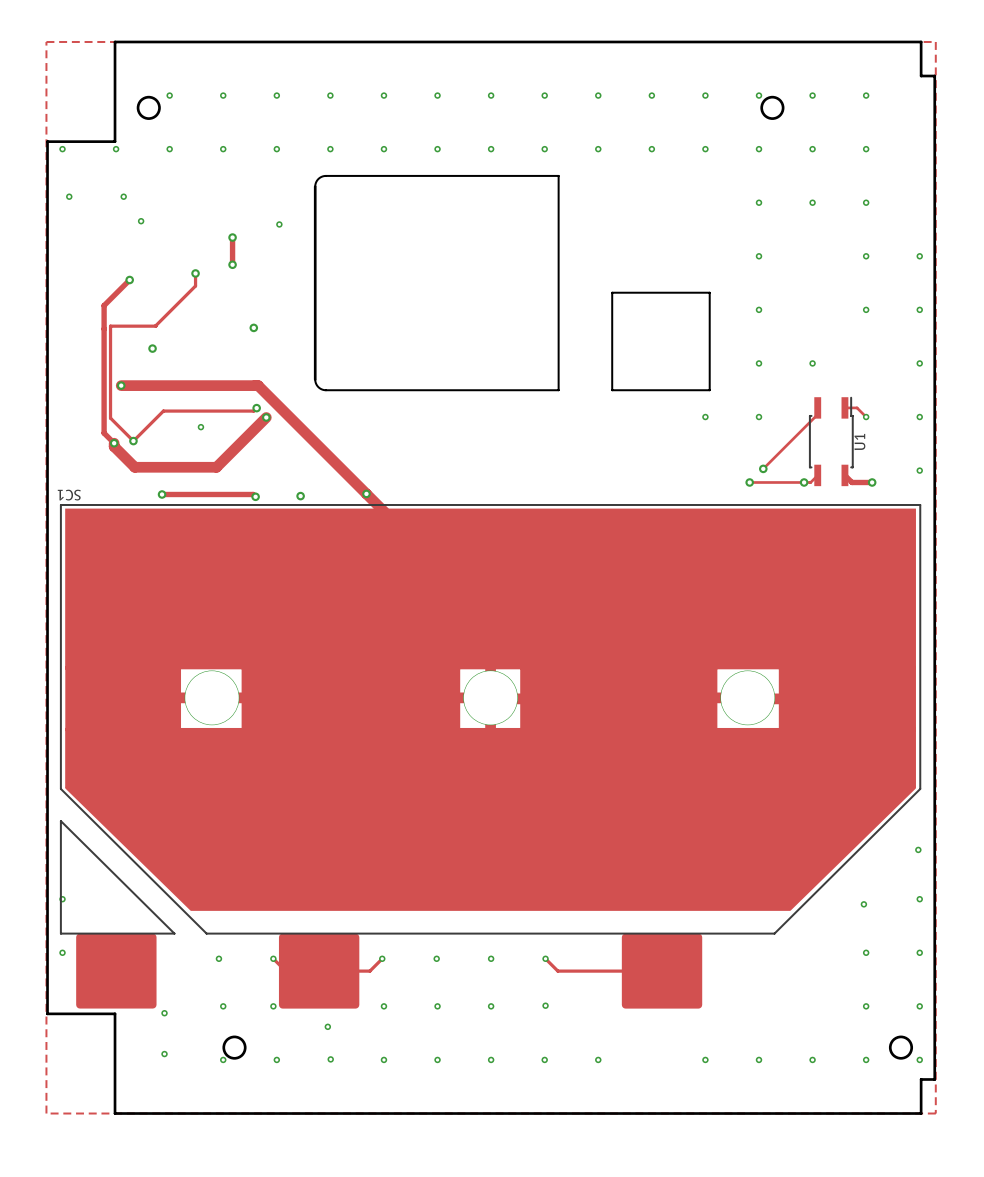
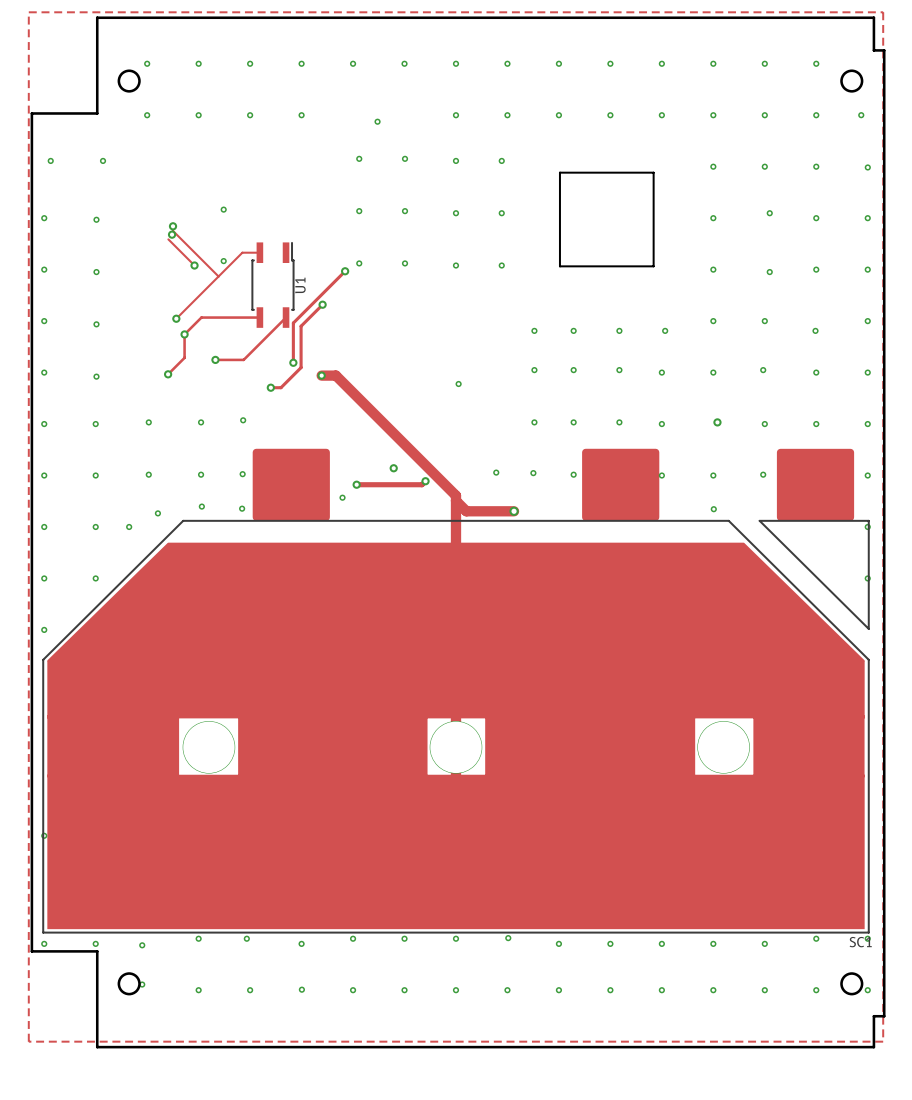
drawing shape: [46, 40, 937, 1115] -> [30, 16, 886, 1049]
via: (62, 149) -> none
via: (116, 149) -> none
via: (383, 149) -> none
via: (437, 149) -> none
via: none -> (861, 115)
via: none -> (377, 121)
via: none -> (359, 158)
via: none -> (405, 158)
via: none -> (455, 160)
via: none -> (501, 160)
via: none -> (867, 167)
via: (141, 221) -> none
via position: (279, 224) -> (223, 209)
track: (232, 237) (232, 264) -> none
via: (232, 237) -> none
via: none -> (359, 211)
via: none -> (405, 211)
via: none -> (455, 213)
via: none -> (501, 213)
via: none -> (769, 213)
via: none -> (44, 218)
via: none -> (96, 219)
track: none -> (173, 226) (173, 230) (218, 276)
via: none -> (173, 226)
via: (232, 264) -> none
track: (195, 273) (195, 285) (155, 326) (110, 326) (110, 418) (133, 441) (163, 411) (253, 411) (256, 408) -> none
track: none -> (168, 239) (194, 265)
track: (129, 280) (104, 305) (104, 433) (114, 443) (114, 446) (134, 467) (216, 467) (266, 417) -> none
via: (129, 280) -> none
track: none -> (259, 252) (242, 252) (176, 318)
via: none -> (223, 261)
via: none -> (359, 263)
via: none -> (405, 263)
via: none -> (194, 265)
via: none -> (455, 265)
via: none -> (501, 265)
via: none -> (44, 269)
track: none -> (345, 271) (293, 323) (293, 362)
via: none -> (345, 271)
via: none -> (96, 272)
via: none -> (769, 272)
via: (253, 327) -> none
track: none -> (322, 304) (301, 326) (301, 367) (280, 387) (270, 387)
via: none -> (322, 304)
via: (152, 348) -> none
track: none -> (259, 317) (201, 317) (184, 334) (184, 357)
track: none -> (286, 317) (243, 359) (215, 359)
via: none -> (176, 318)
via: none -> (44, 321)
via: none -> (96, 324)
via: none -> (534, 330)
via: none -> (573, 330)
via: none -> (619, 330)
via: none -> (665, 330)
via: none -> (815, 330)
via: none -> (184, 334)
track: (121, 385) (258, 385) (461, 588) (490, 588) (490, 757) -> none
via: (121, 385) -> none
track: none -> (184, 357) (168, 374)
via: none -> (215, 359)
via: none -> (293, 362)
track: (817, 407) (817, 414) (763, 468) -> none
track: (844, 407) (857, 407) (866, 417) -> none
via: (256, 408) -> none
via: none -> (534, 370)
via: none -> (573, 370)
via: none -> (619, 370)
via: none -> (763, 370)
via: none -> (44, 372)
via: (266, 417) -> none
via: none -> (168, 374)
track: none -> (321, 375) (335, 375) (455, 495) (455, 853)
via: none -> (321, 375)
via: none -> (96, 376)
via: (200, 427) -> none
via: none -> (458, 384)
via: none -> (270, 387)
via: (133, 441) -> none
U1 position: (831, 441) -> (272, 285)
via: (114, 443) -> none
via: none -> (243, 420)
via: none -> (148, 422)
via: none -> (201, 422)
via: none -> (534, 422)
via: none -> (573, 422)
via: none -> (619, 422)
via: none -> (44, 424)
via: none -> (95, 424)
via: none -> (661, 424)
via: none -> (764, 424)
via: none -> (816, 424)
track: (817, 475) (810, 482) (749, 482) -> none
track: (844, 475) (852, 482) (872, 482) -> none
via: (749, 482) -> none
via: (804, 482) -> none
via: (872, 482) -> none
via: (366, 493) -> none
track: (162, 494) (253, 494) (255, 496) -> none
via: (162, 494) -> none
via: (255, 496) -> none
via: (300, 496) -> none
via: none -> (393, 468)
via: none -> (496, 472)
via: none -> (533, 473)
via: none -> (242, 474)
via: none -> (148, 474)
via: none -> (201, 474)
via: none -> (573, 474)
via: none -> (763, 474)
via: none -> (44, 475)
via: none -> (95, 475)
via: none -> (661, 475)
via: none -> (713, 475)
via: none -> (867, 475)
track: none -> (425, 481) (422, 484) (356, 484)
via: none -> (425, 481)
via: none -> (356, 484)
via: none -> (342, 497)
track: none -> (455, 500) (466, 511) (514, 511)
via: none -> (201, 506)
via: none -> (242, 508)
via: none -> (713, 509)
via: none -> (514, 511)
via: none -> (157, 513)
via: none -> (44, 526)
via: none -> (95, 526)
via: none -> (129, 526)
via: none -> (867, 526)
via: none -> (44, 578)
via: none -> (95, 578)
via: none -> (867, 578)
via: none -> (44, 629)
SC1 rotation: 0° (490, 756) -> 180° (455, 691)
via: (918, 849) -> none
via: (919, 899) -> none
via: (863, 904) -> none
via: (62, 952) -> none
via: (866, 952) -> none
via: (919, 952) -> none
via: (218, 958) -> none
via: (273, 958) -> none
via: (382, 958) -> none
via: (436, 958) -> none
via: (491, 958) -> none
track: (545, 958) (557, 971) (662, 971) -> none
via: (545, 958) -> none
via: none -> (44, 943)
via: none -> (95, 943)
via: none -> (558, 943)
via: none -> (610, 943)
via: none -> (661, 943)
via: none -> (713, 943)
via: none -> (764, 943)
via position: (327, 1026) -> (301, 943)
via: none -> (610, 990)

